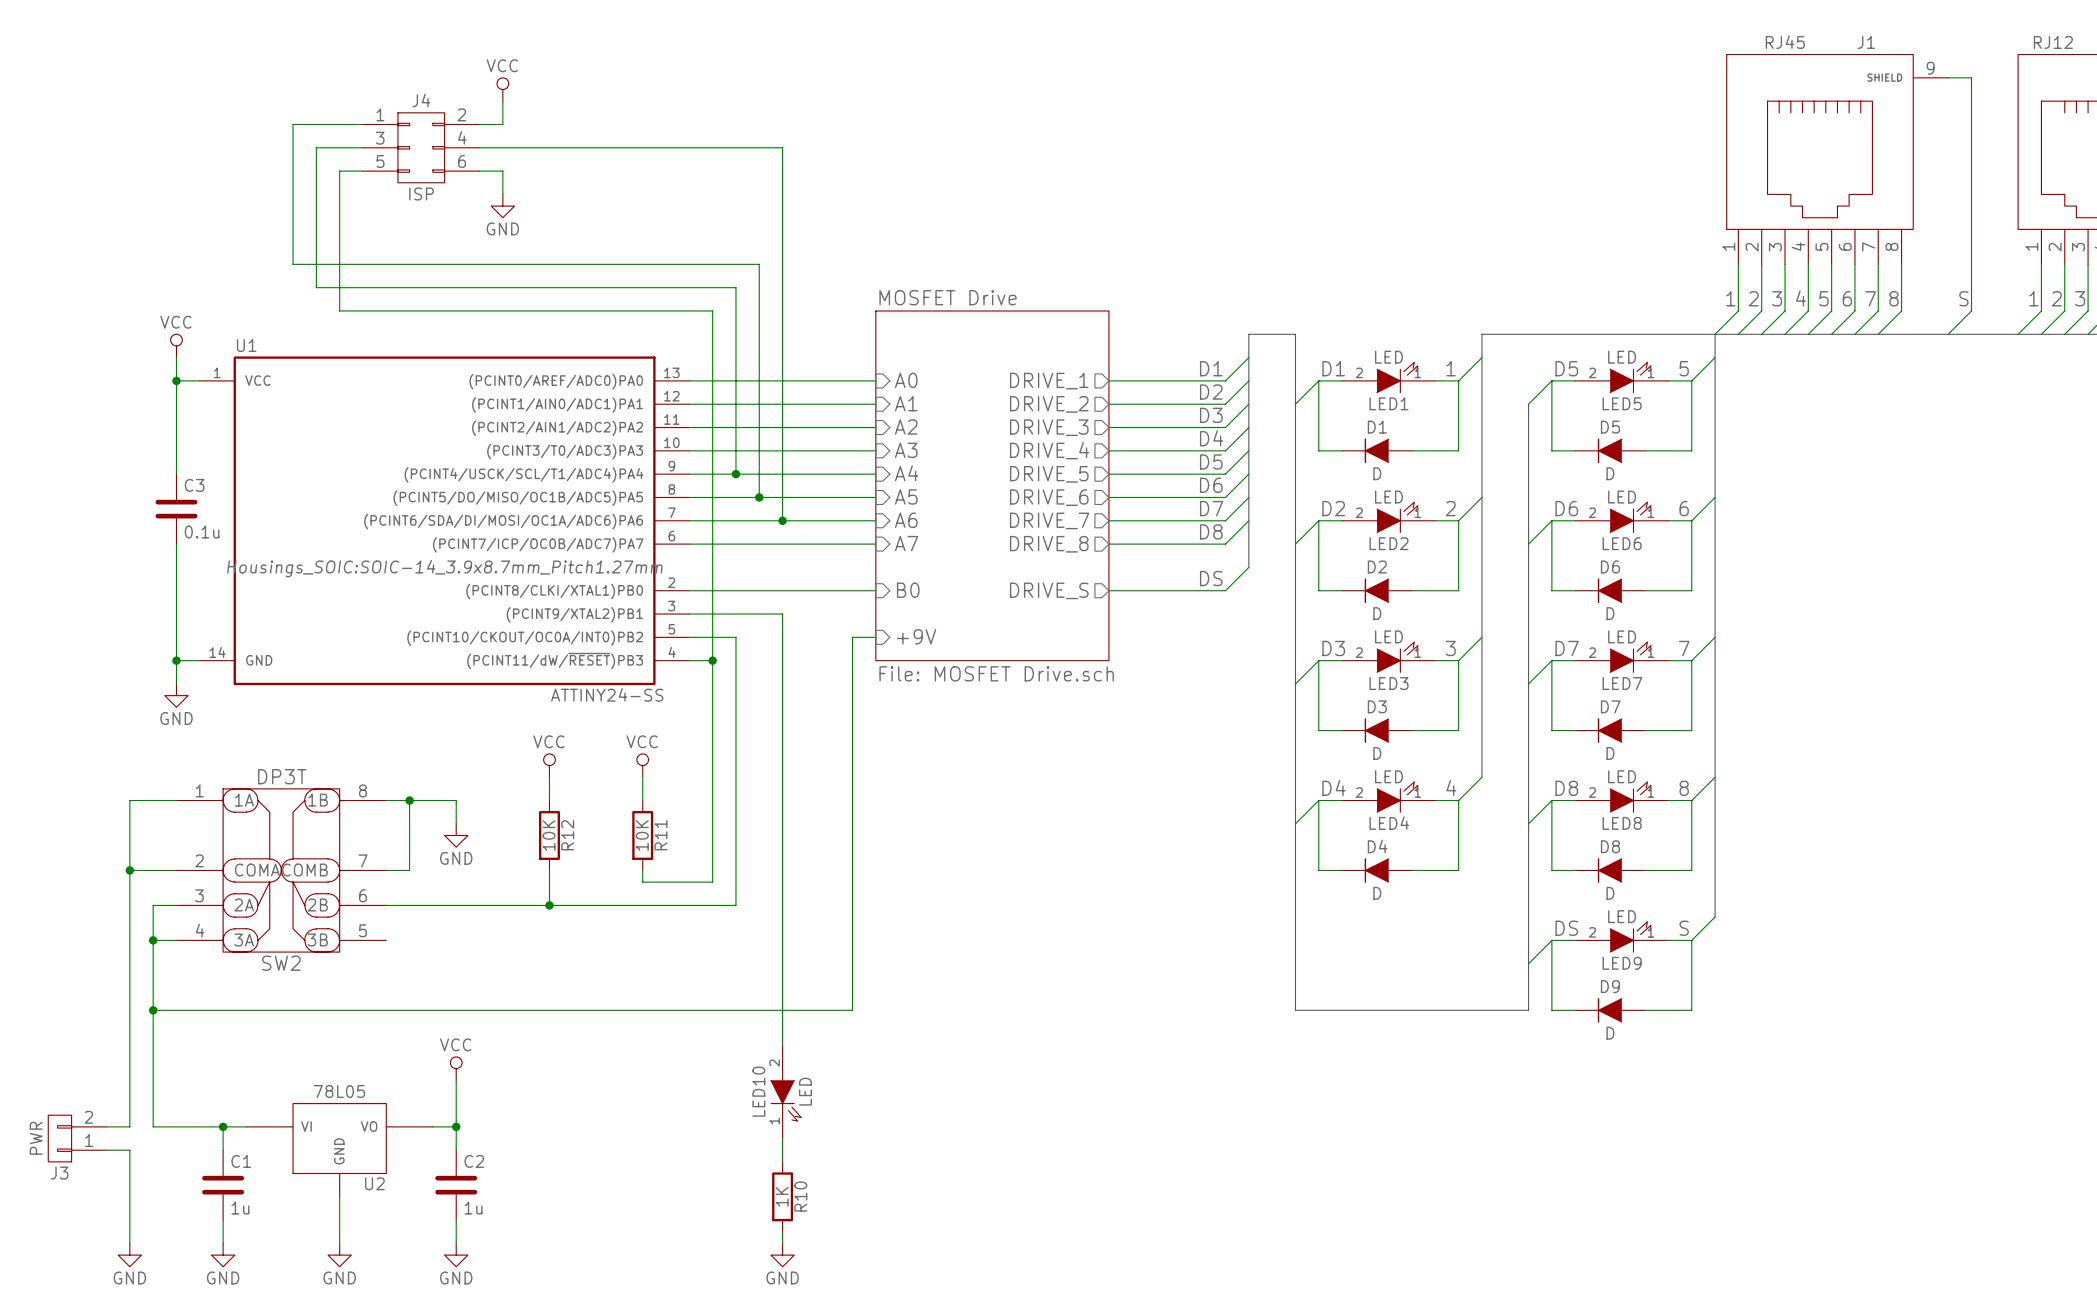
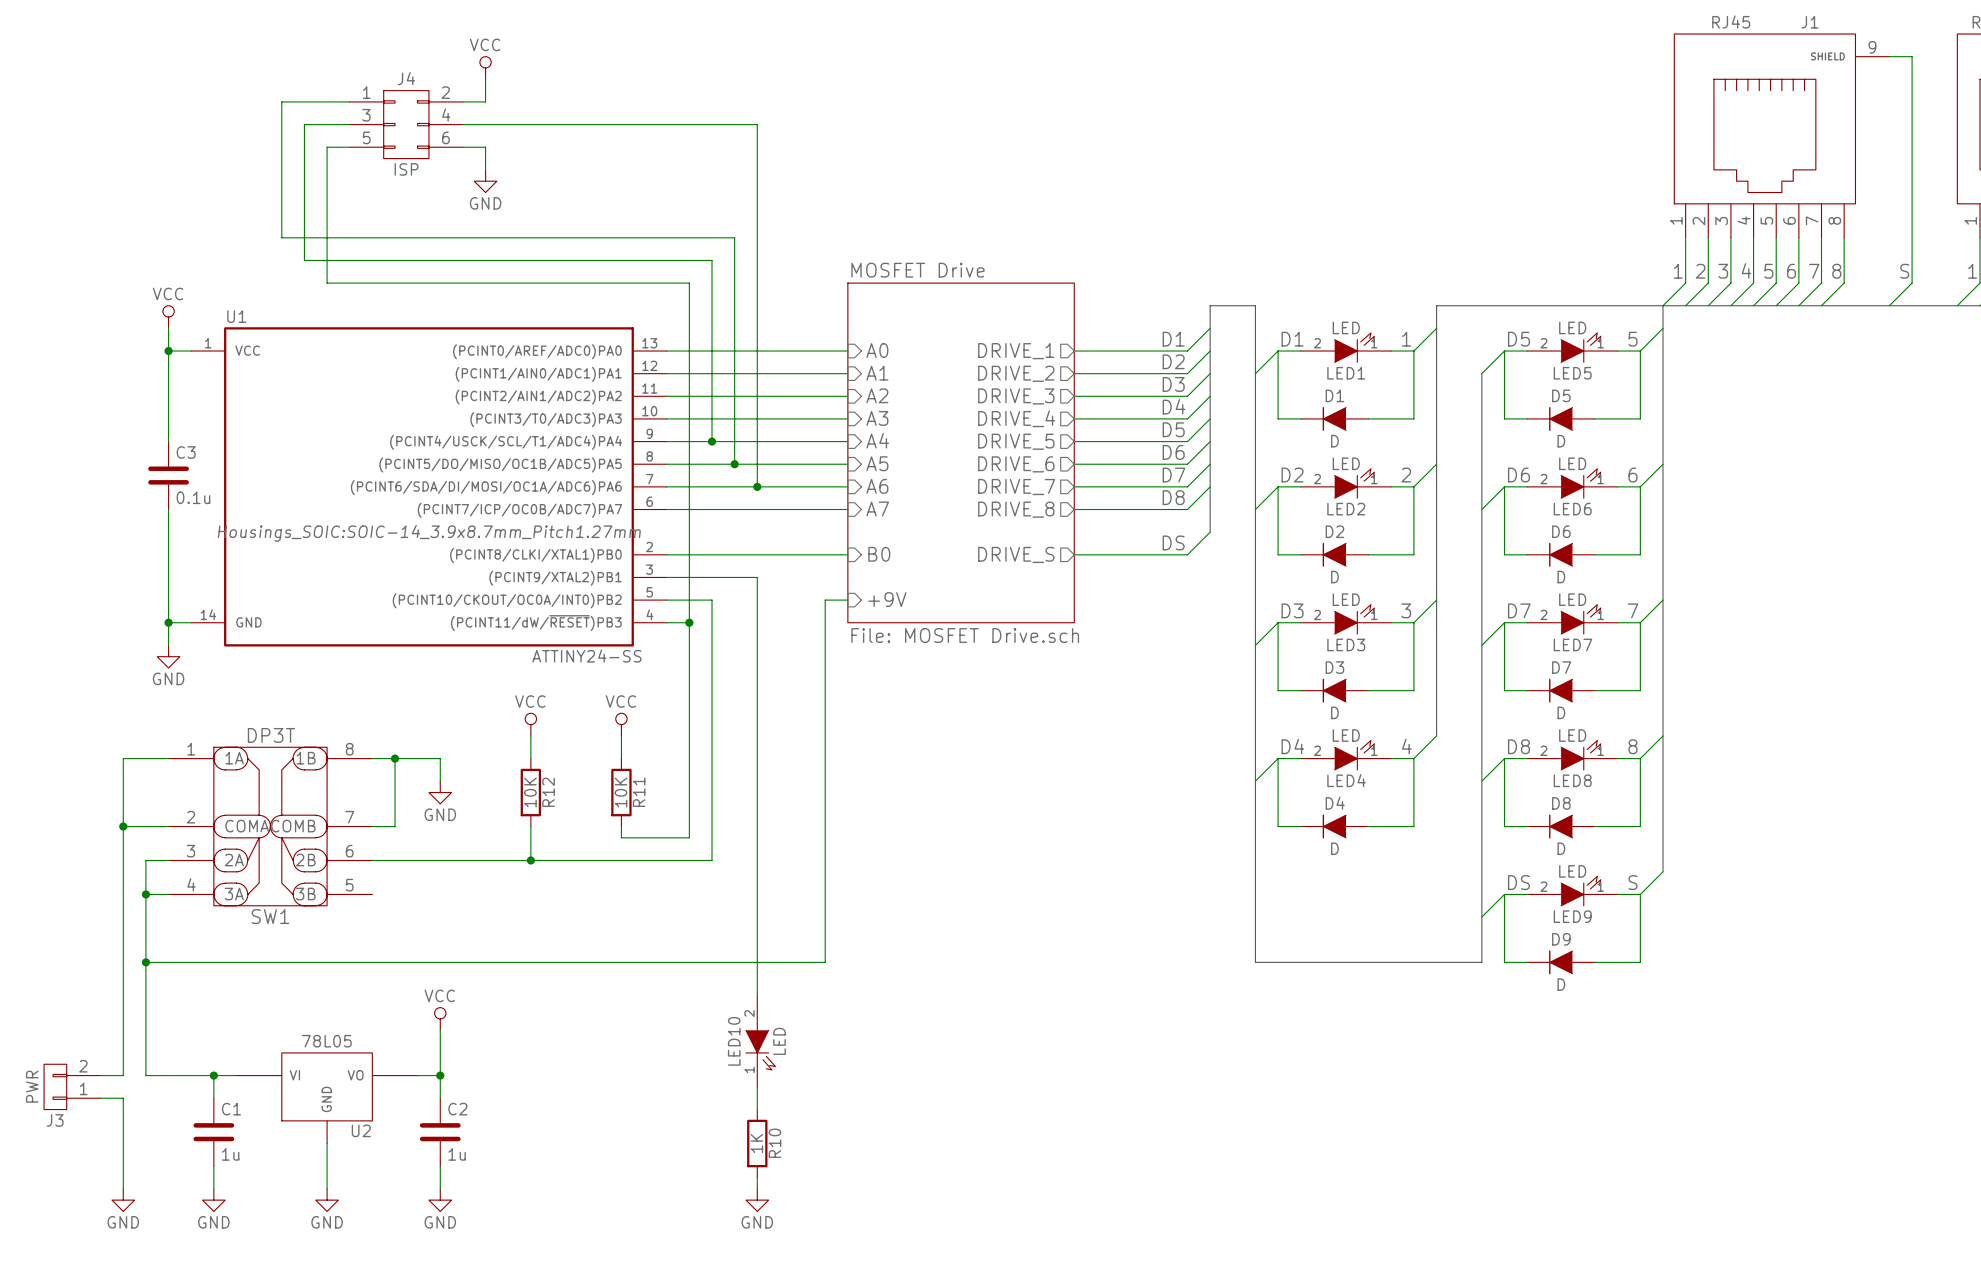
SW2 name: SW2 (281, 963) -> SW1 (270, 916)

